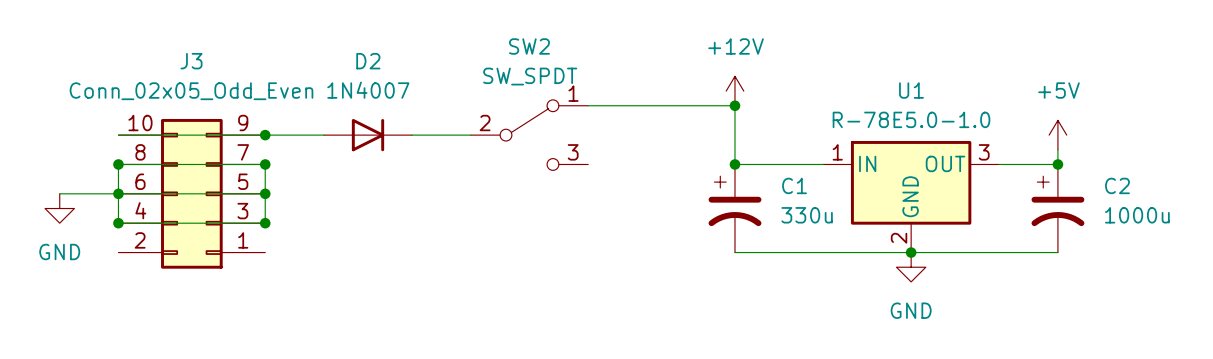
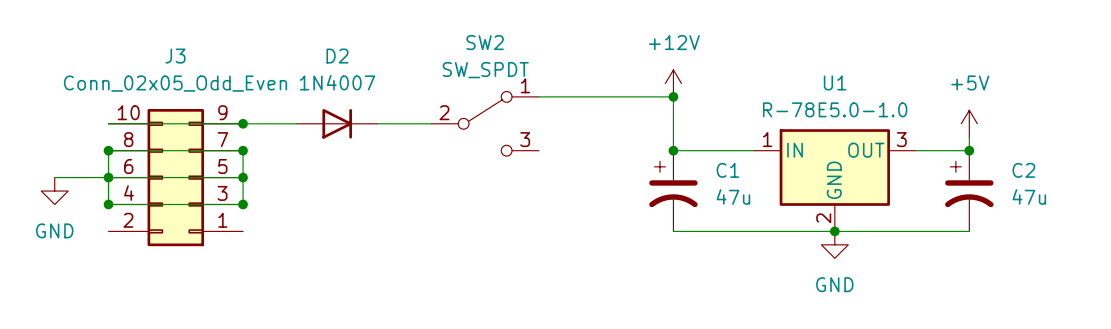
C1 value: 330u (807, 215) -> 47u (733, 196)
C2 value: 1000u (1137, 215) -> 47u (1029, 196)

